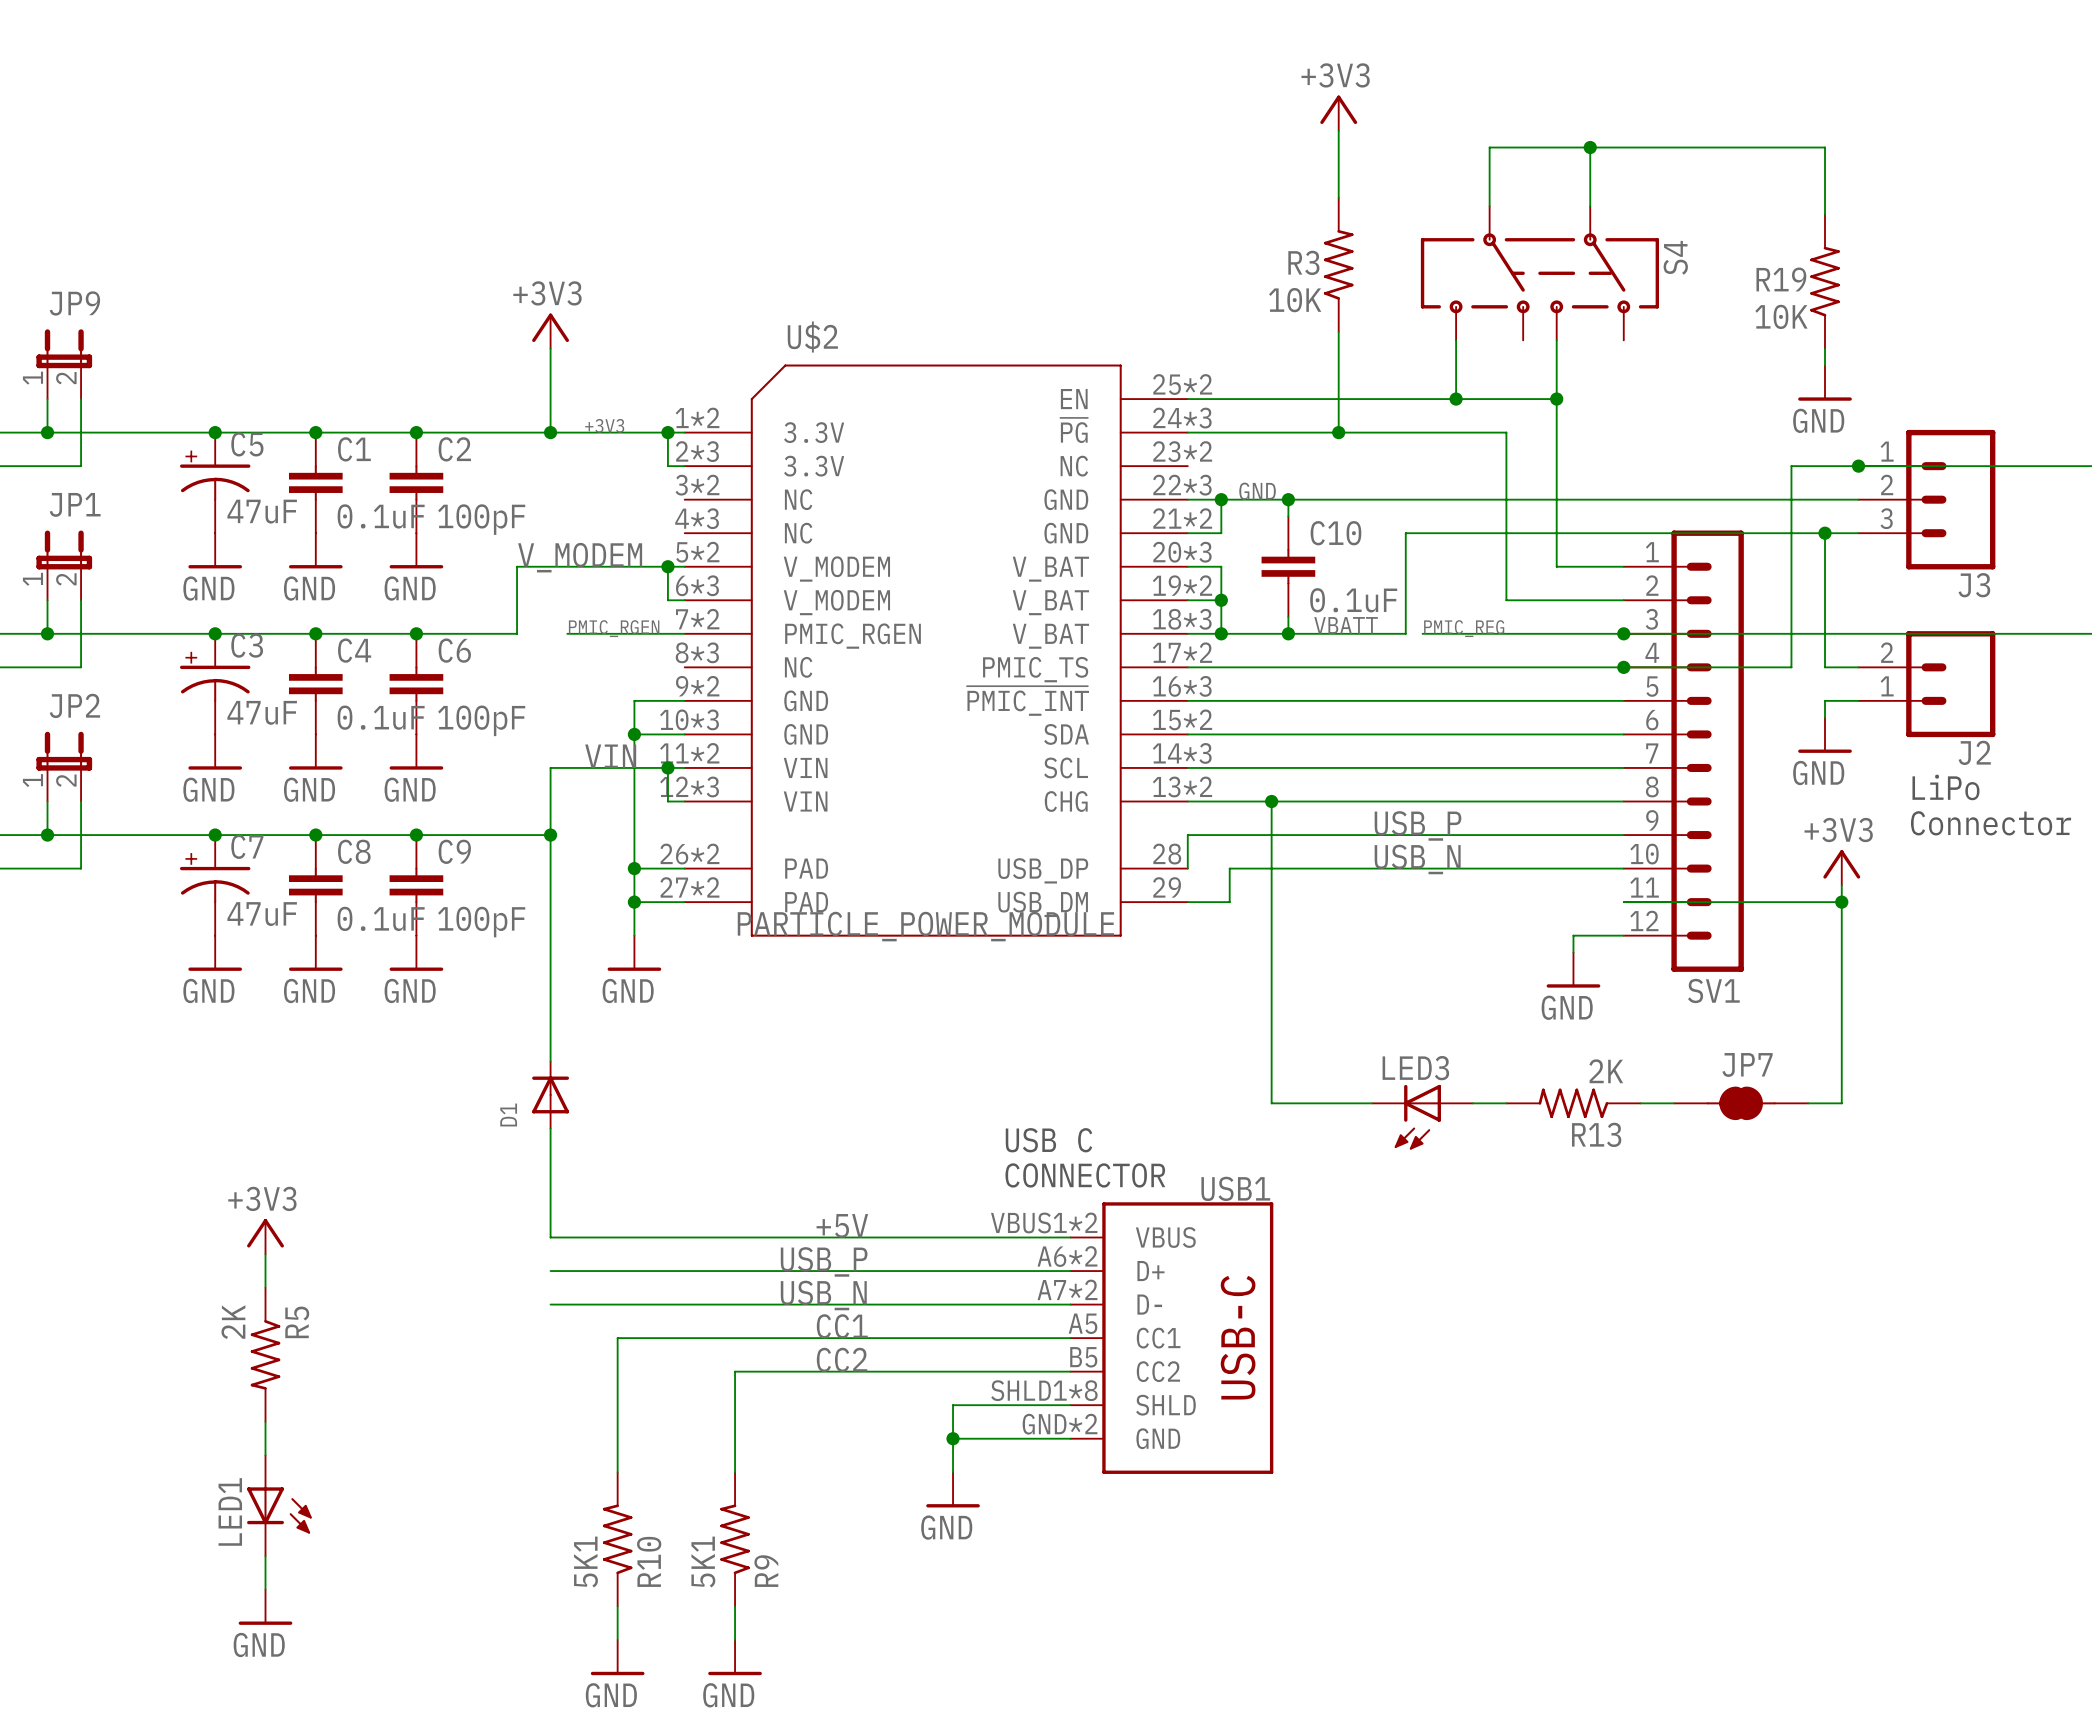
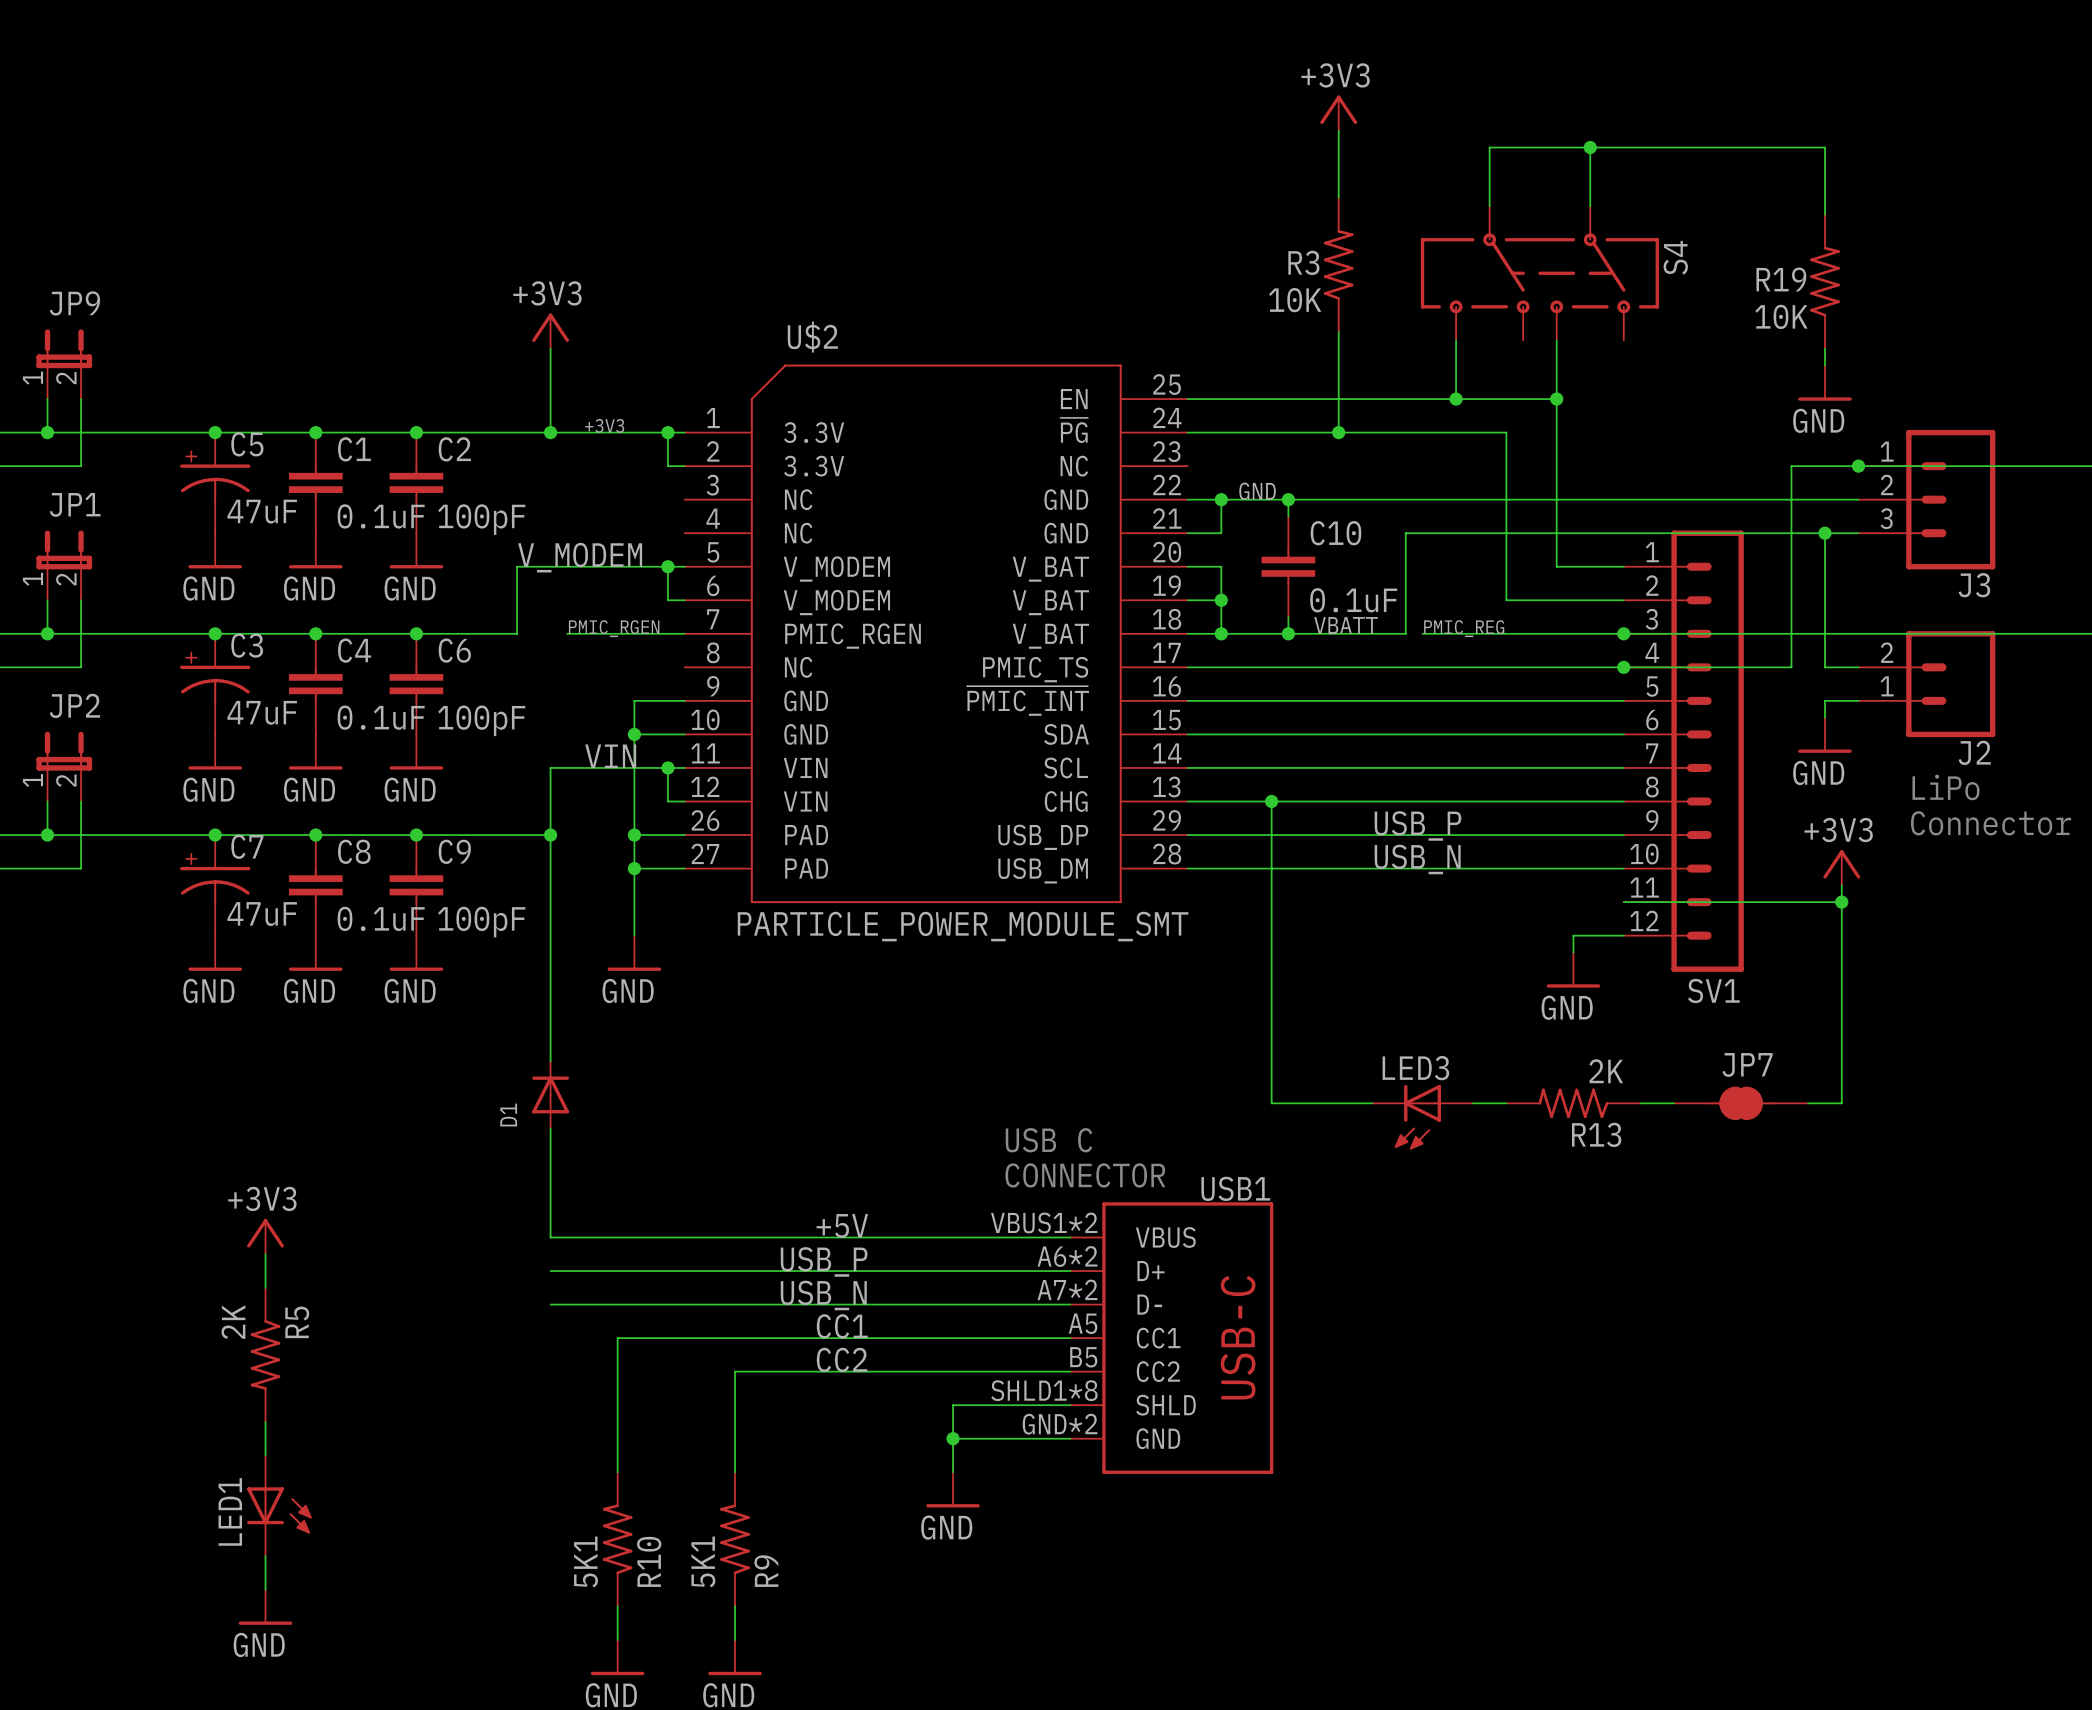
U$2 symbol: [684, 364, 1188, 937] -> [684, 364, 1188, 904]
wire: (1187, 835) (1187, 868) -> none
wire: (1229, 868) (1229, 902) (1187, 902) -> (1229, 868) (1187, 868)
wire: (634, 902) (684, 902) -> (634, 835) (684, 835)
junction position: (634, 902) -> (634, 835)
U$2 value: PARTICLE_POWER_MODULE (925, 926) -> PARTICLE_POWER_MODULE_SMT (963, 926)

